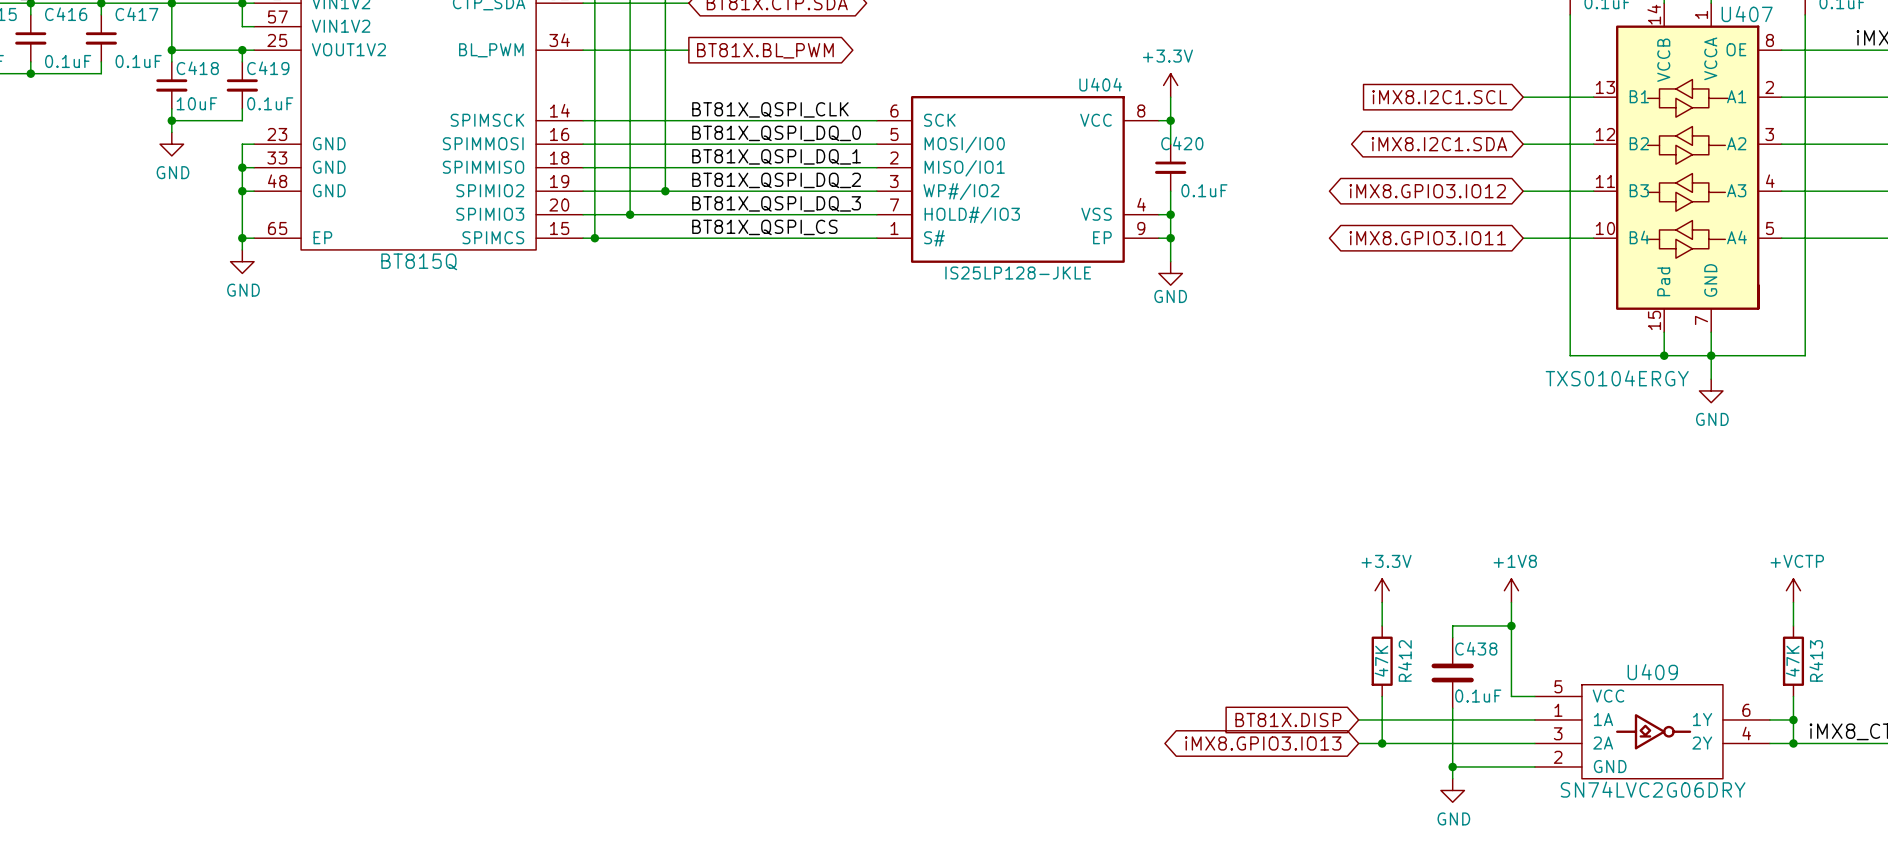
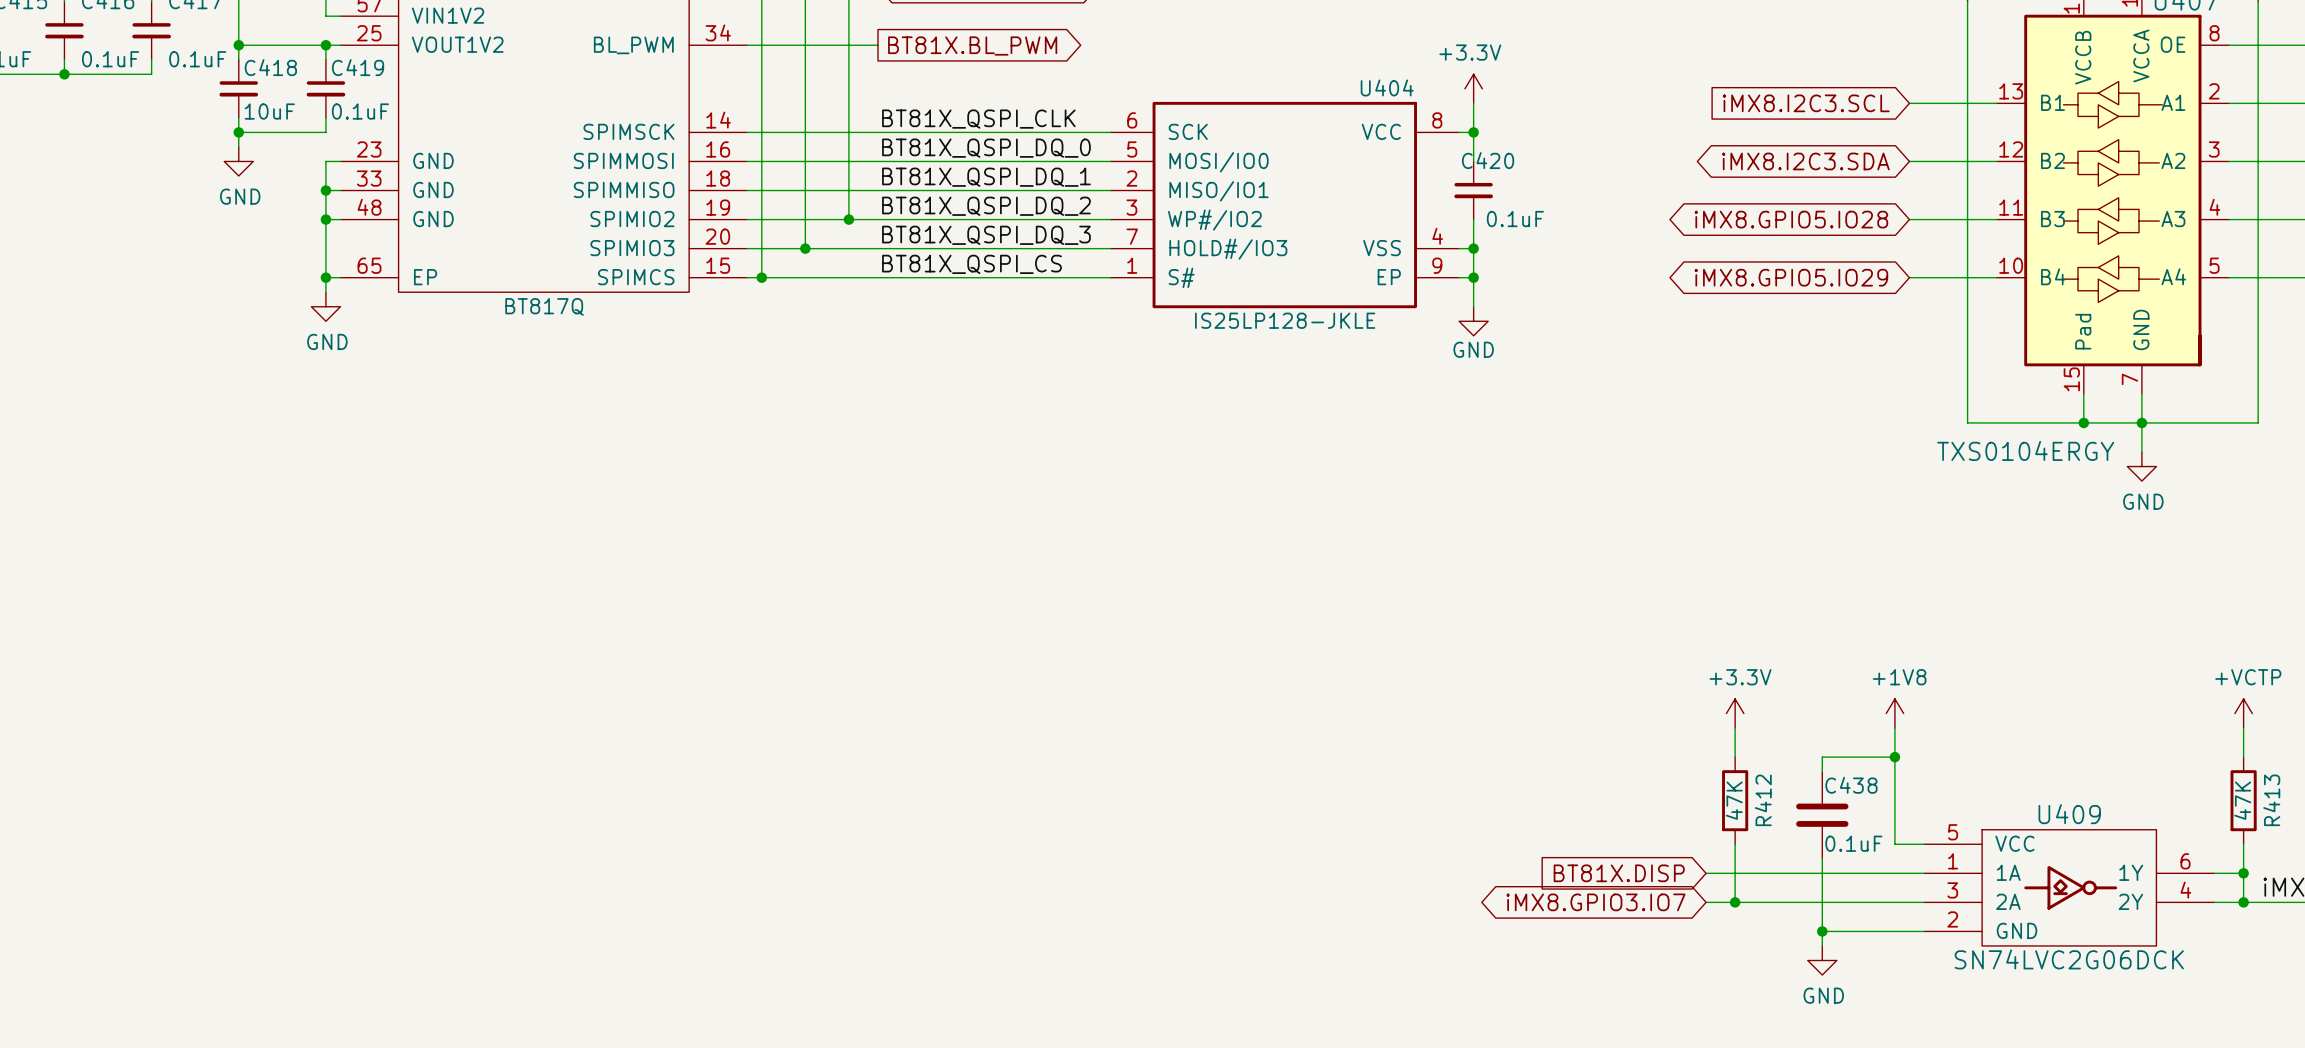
global label: iMX8.I2C1.SCL (1439, 97) -> iMX8.I2C3.SCL (1806, 103)
global label: iMX8.I2C1.SDA (1439, 144) -> iMX8.I2C3.SDA (1805, 161)
global label: iMX8.GPIO3.IO12 (1427, 191) -> iMX8.GPIO5.IO28 (1791, 219)
global label: iMX8.GPIO3.IO11 (1427, 238) -> iMX8.GPIO5.IO29 (1791, 277)
part value: BT815Q (419, 261) -> BT817Q (544, 306)
global label: iMX8.GPIO3.IO13 (1263, 743) -> iMX8.GPIO3.IO7 (1596, 902)
U409 value: SN74LVC2G06DRY (1653, 789) -> SN74LVC2G06DCK (2069, 959)

